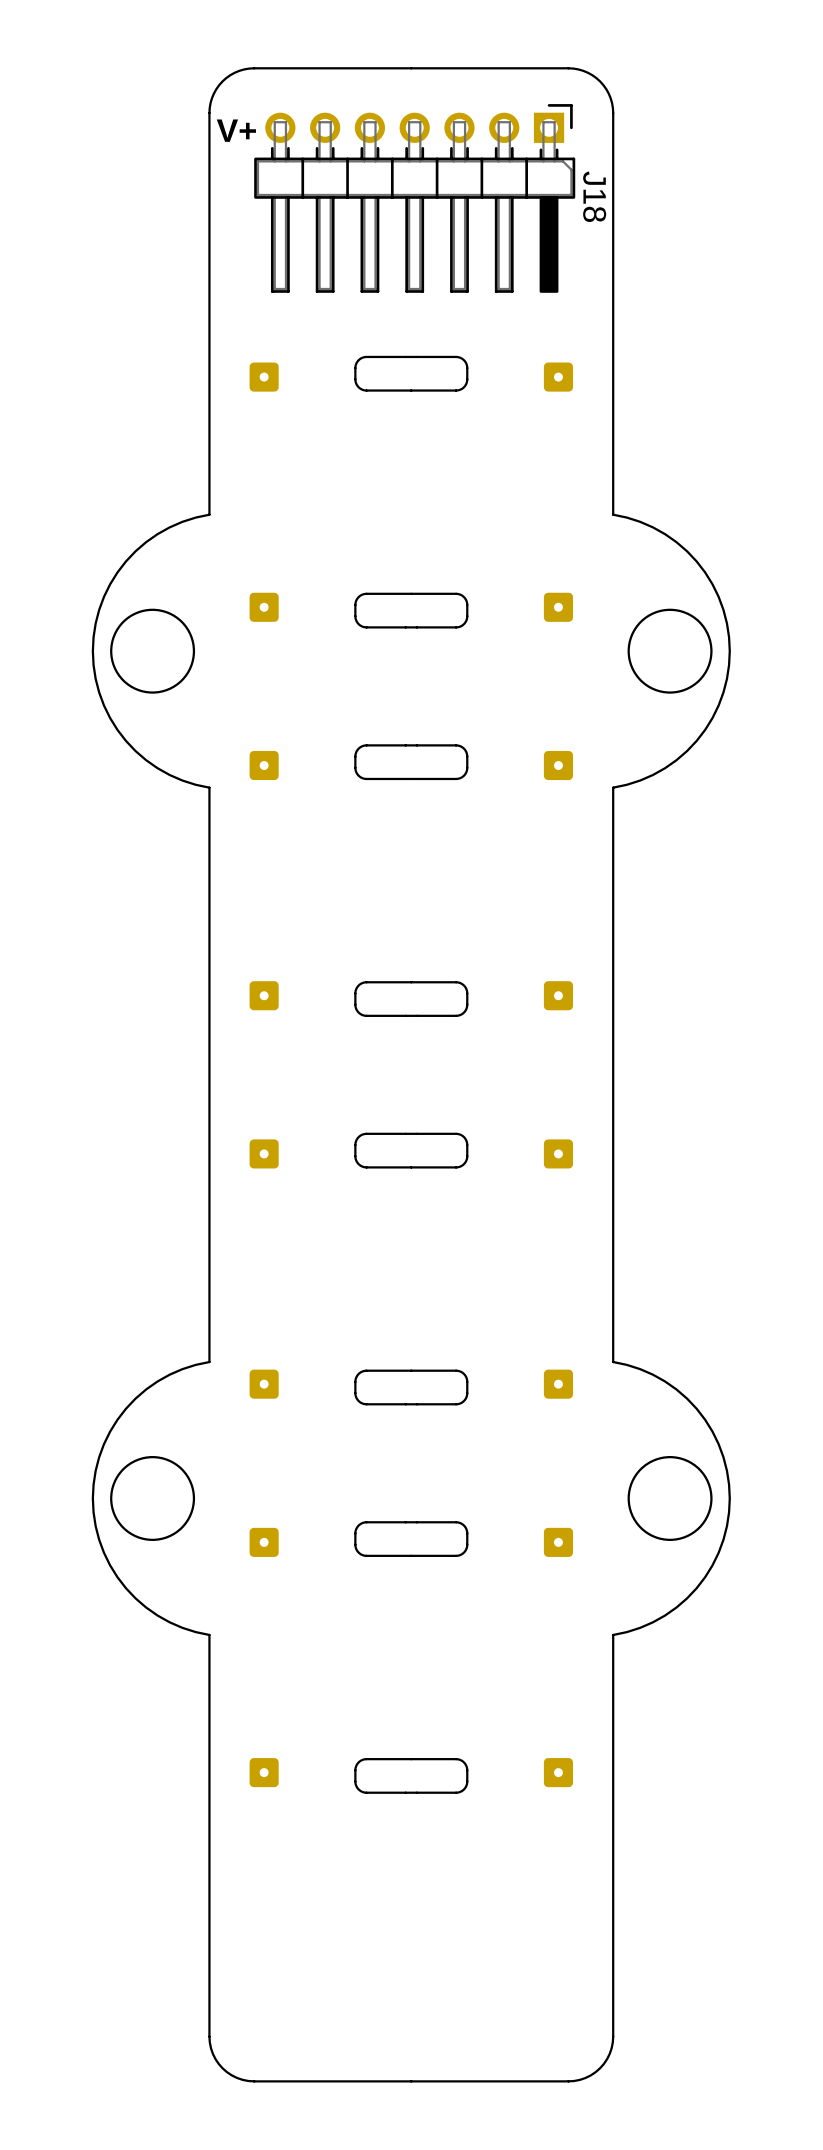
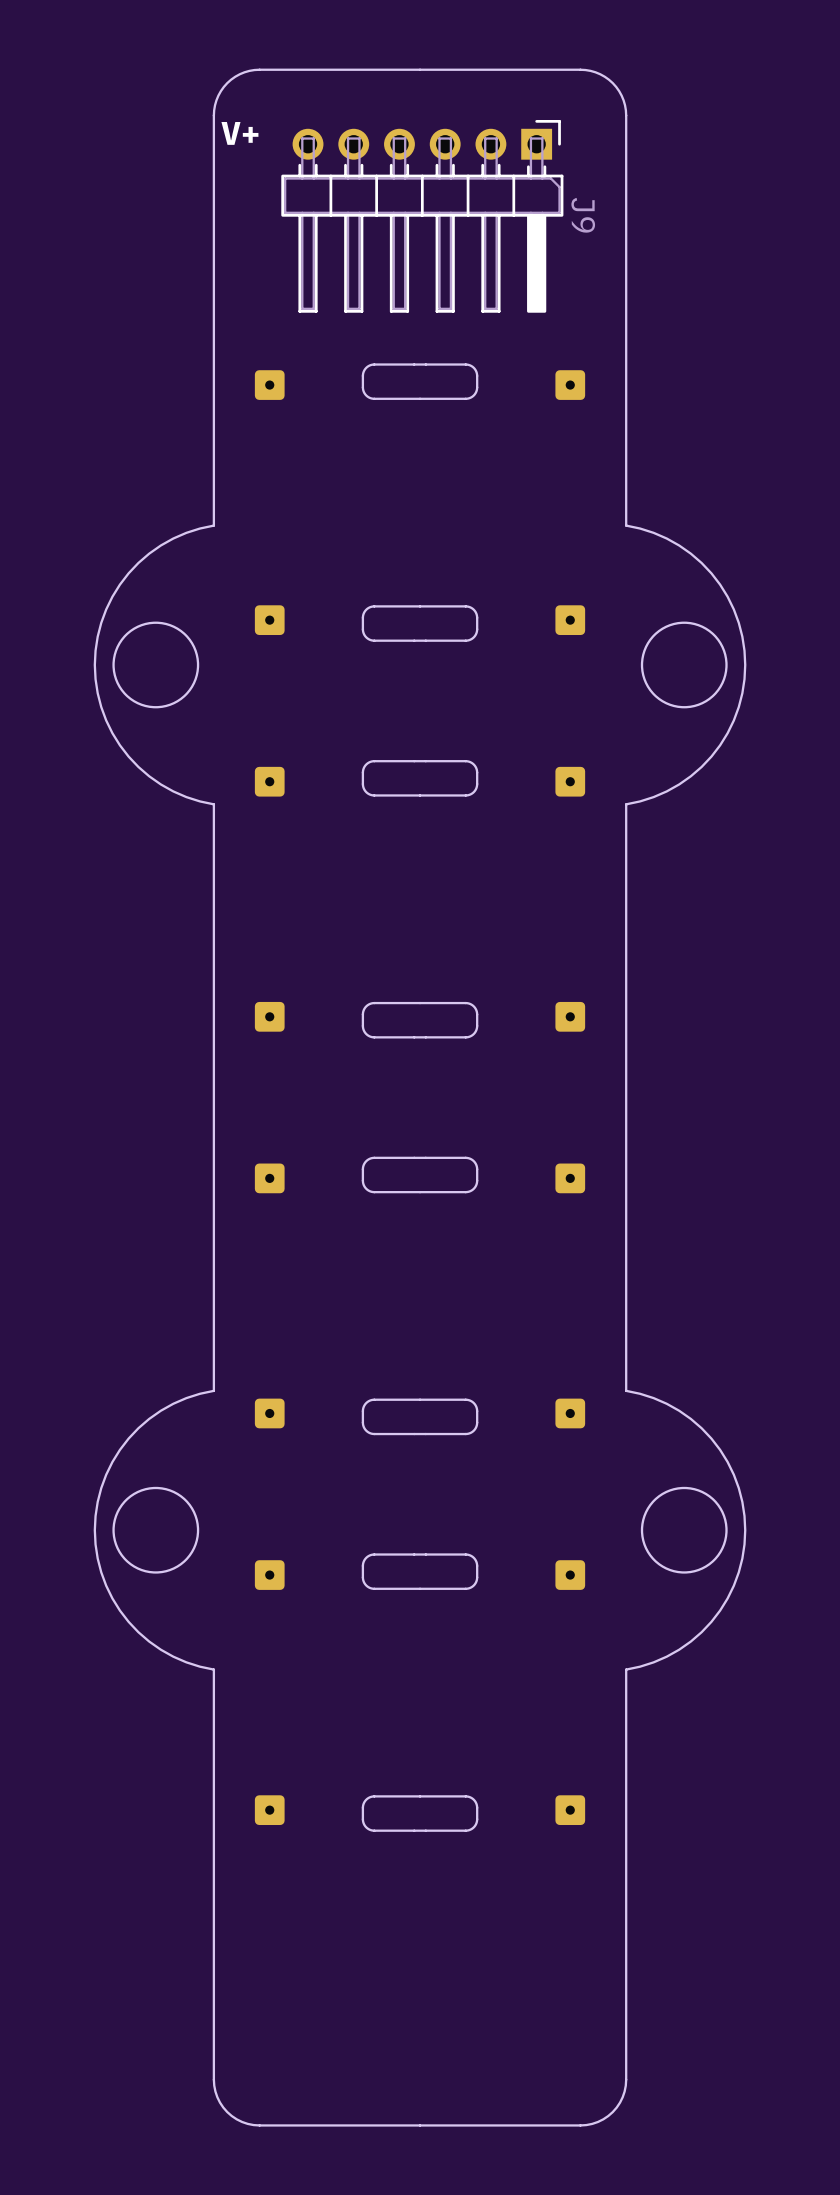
J18: (414, 198) -> none
J9: none -> (422, 216)

